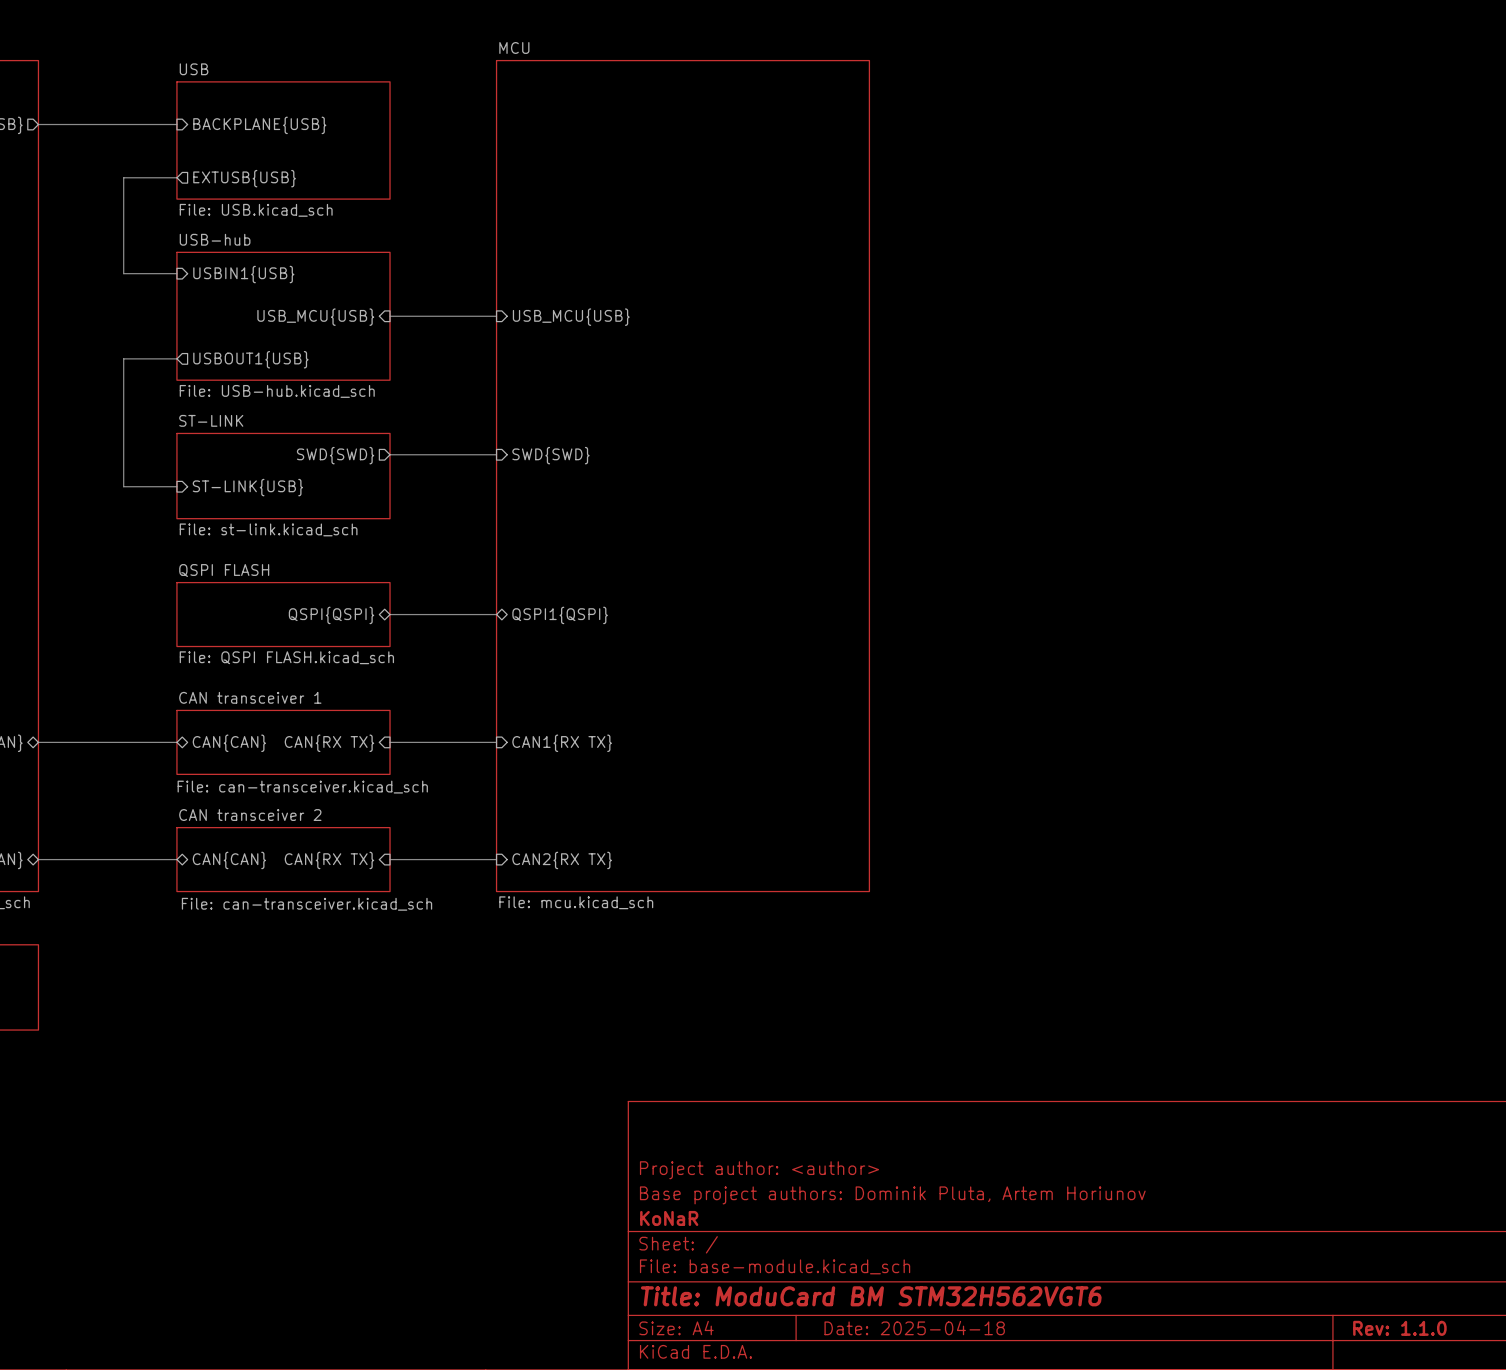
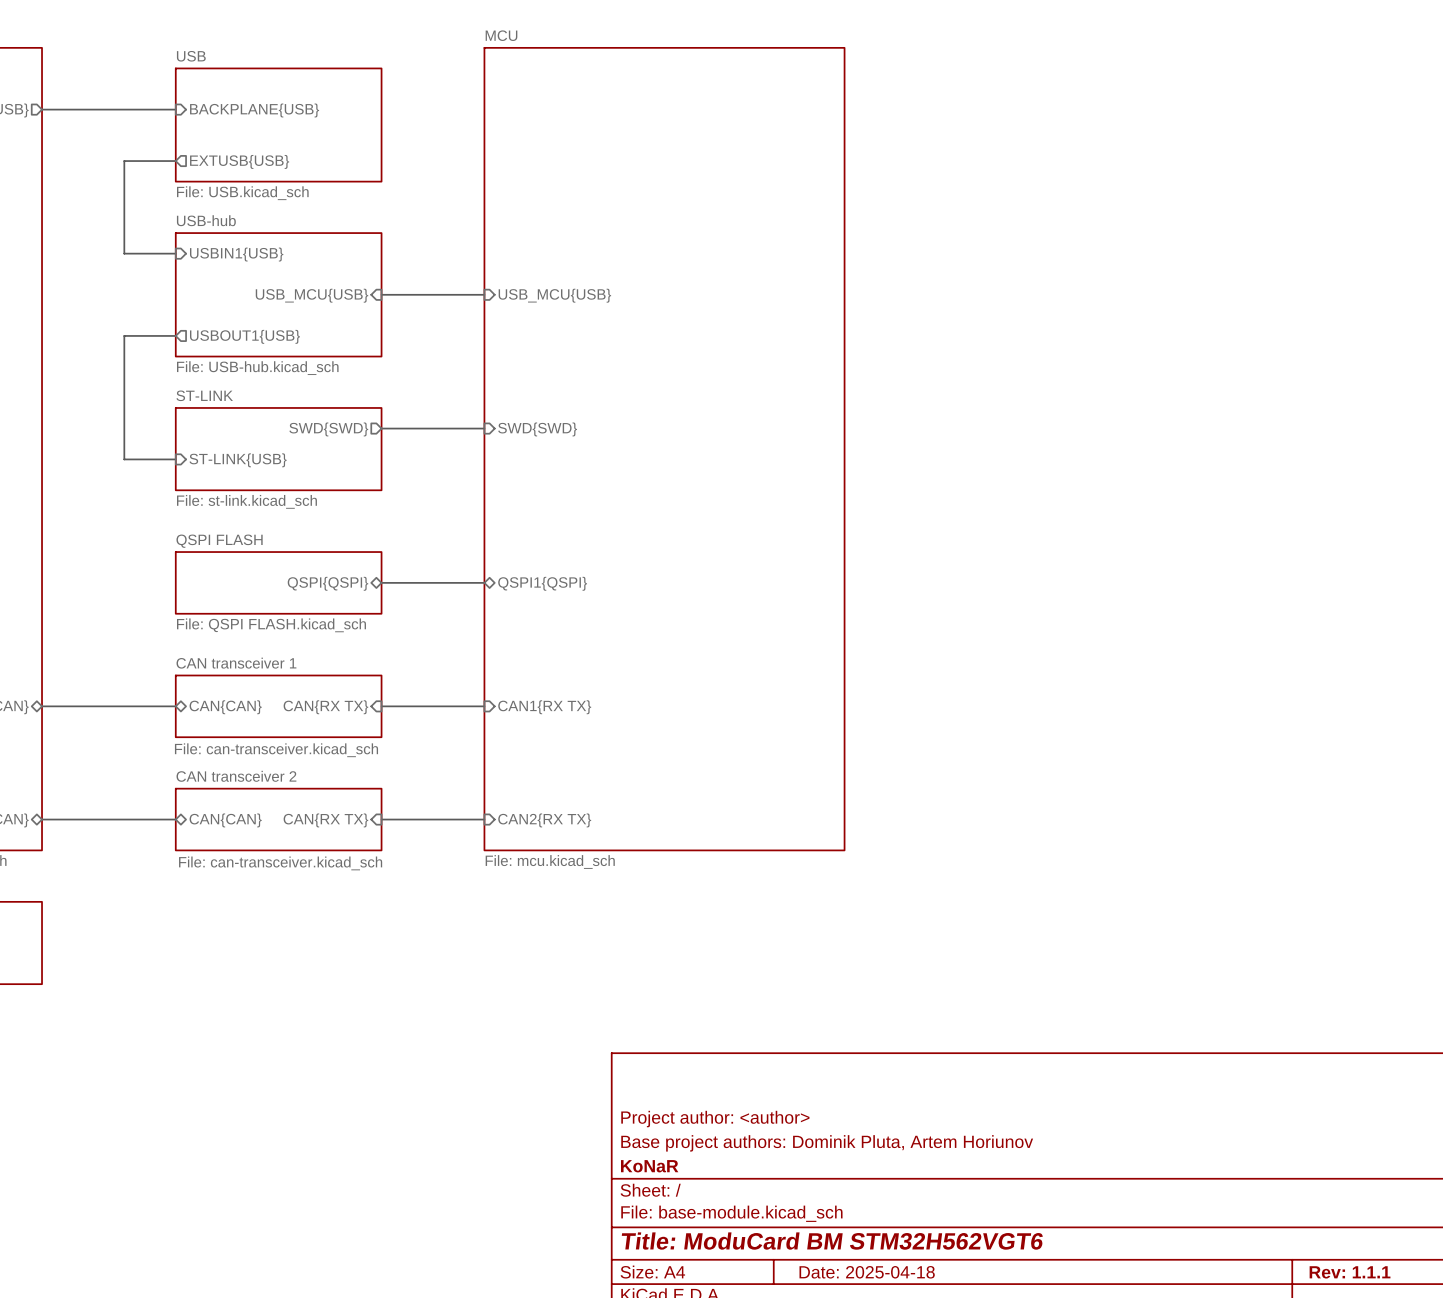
title block: Rev: 1.1.0 (1399, 1328) -> Rev: 1.1.1 (1350, 1272)

